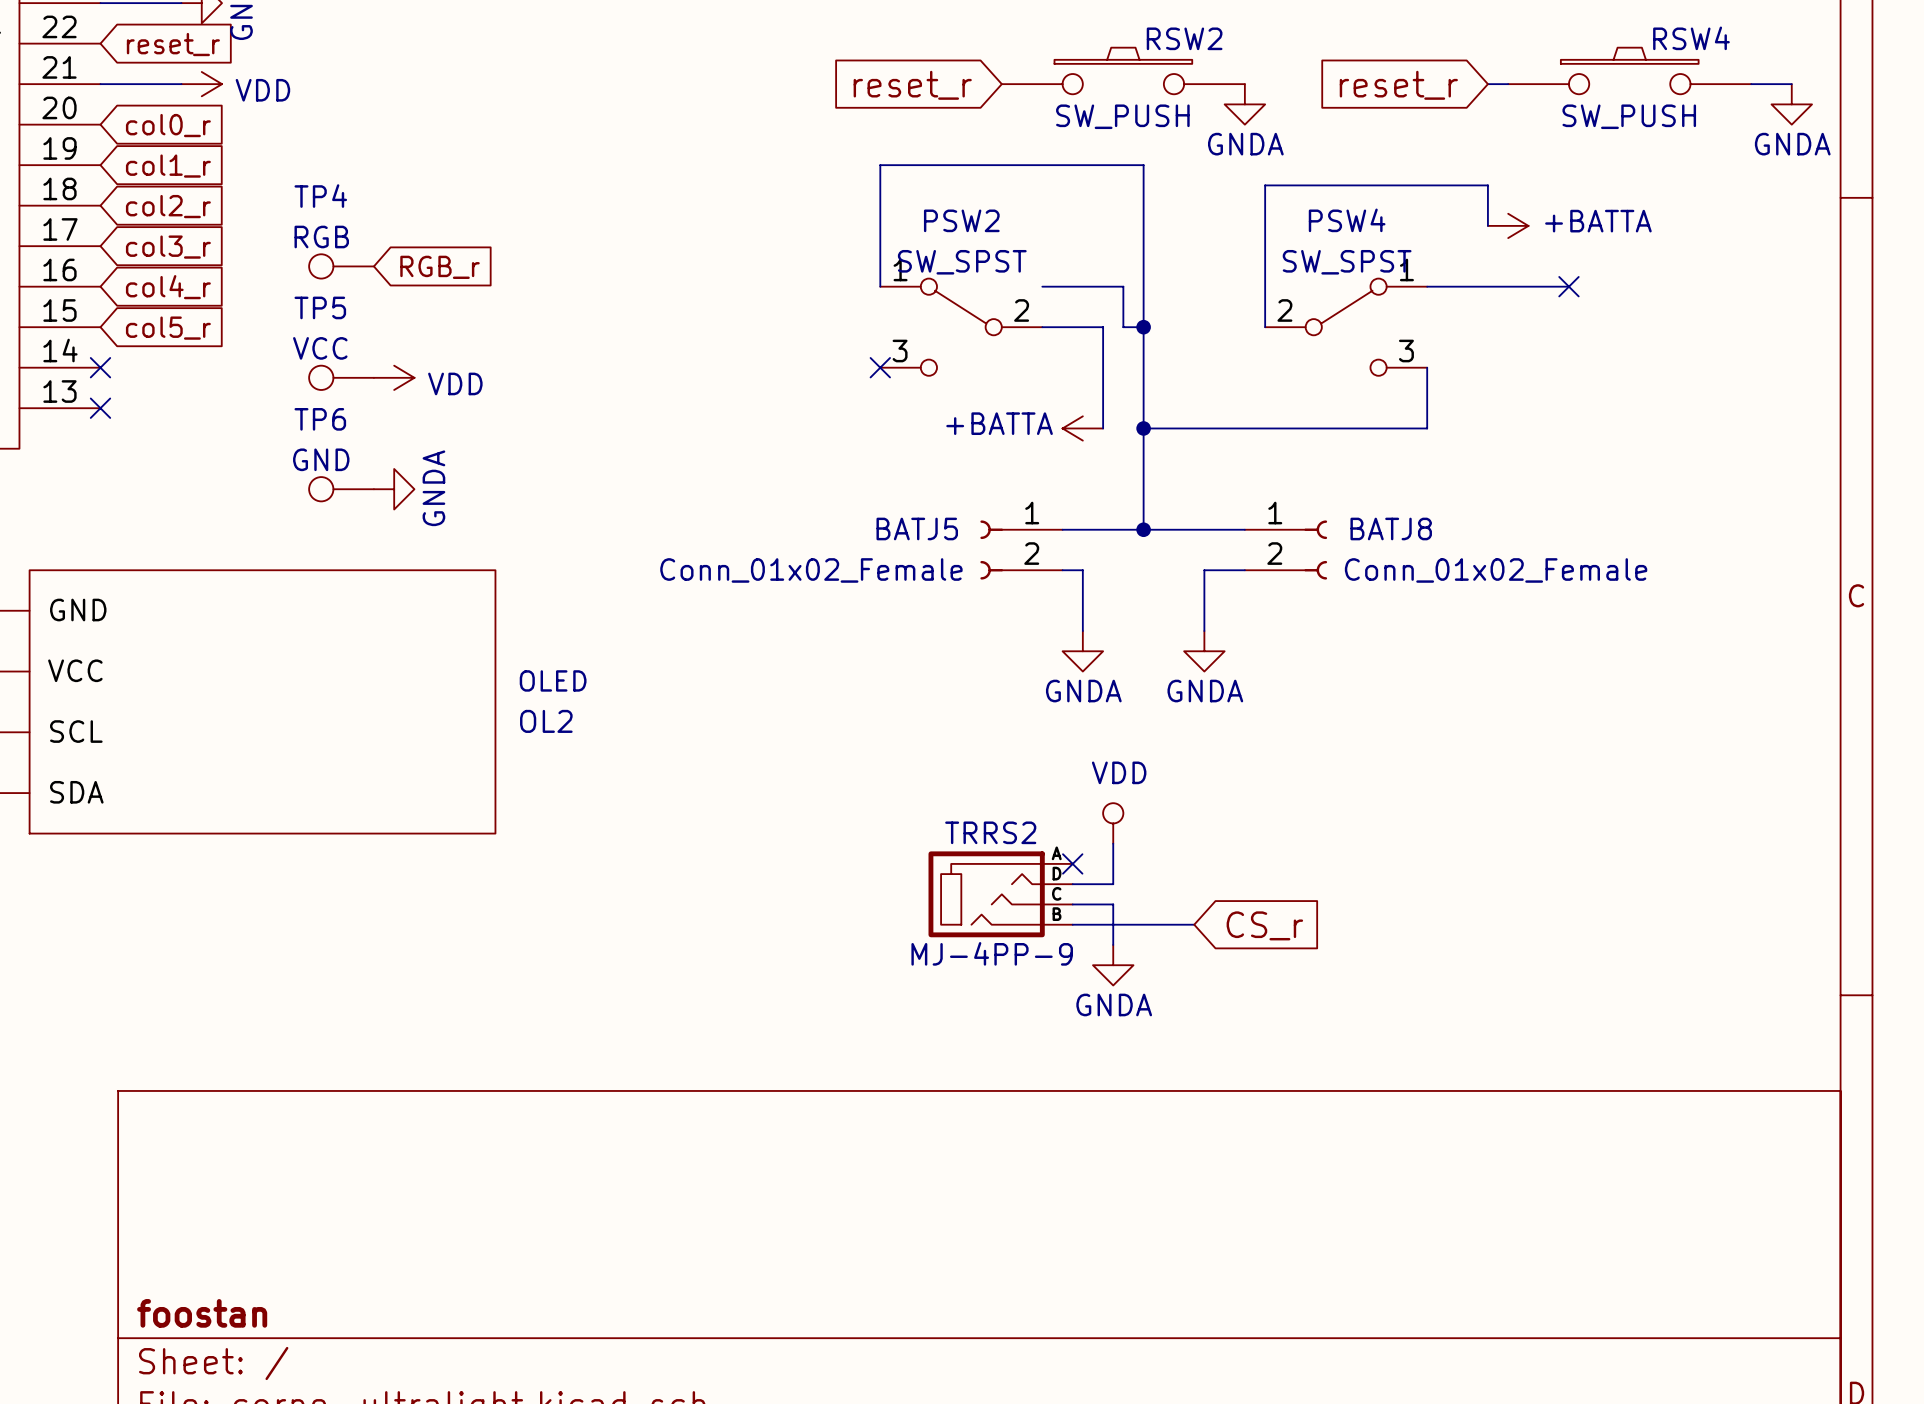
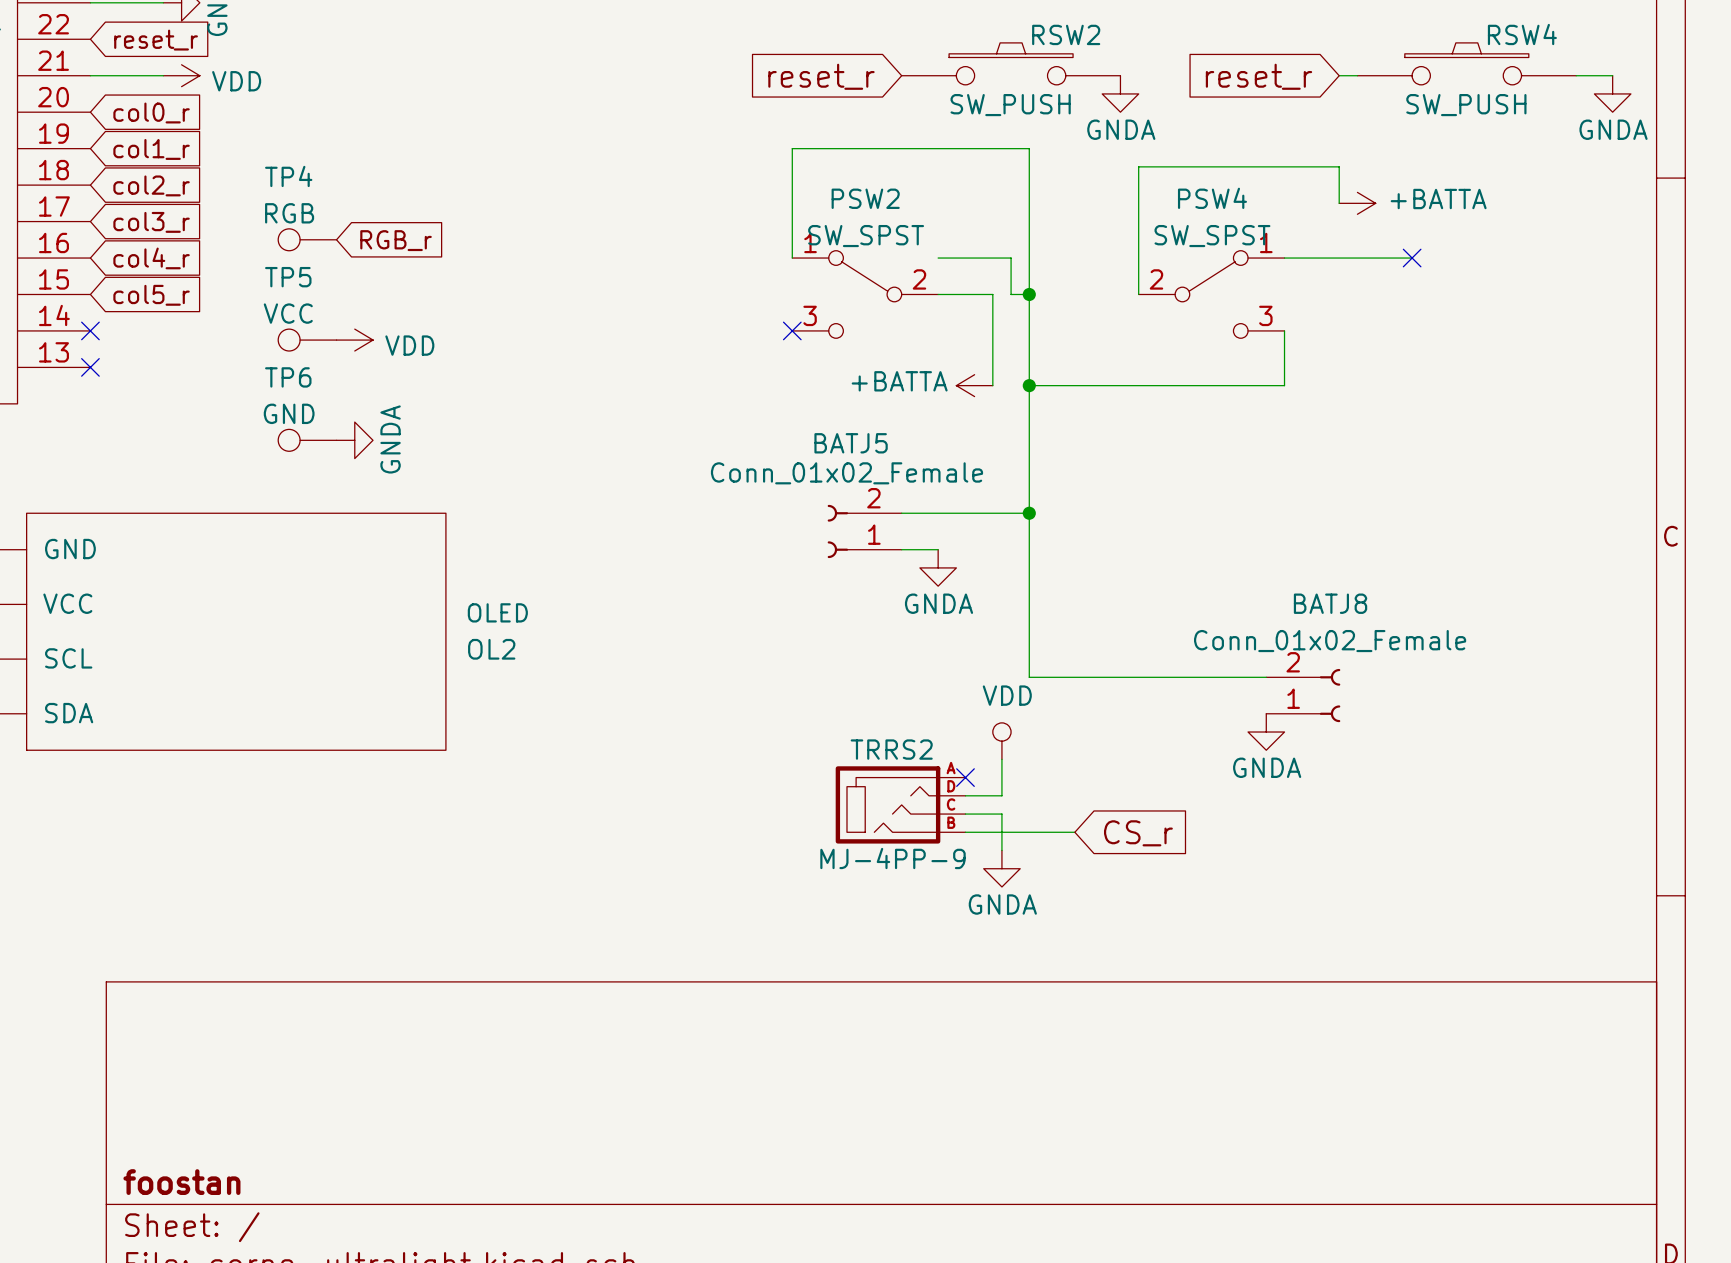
BATJ5 name position: BATJ5 (917, 528) -> BATJ5 (851, 443)
BATJ8 name position: BATJ8 (1391, 528) -> BATJ8 (1330, 603)
wire: (1062, 529) (1244, 529) -> none
wire: none -> (1029, 476) (1029, 677) (1266, 677)
junction position: (1143, 529) -> (1029, 513)
BATJ5 flip: as is (991, 550) -> up-down (837, 531)
BATJ5 position: (1021, 550) -> (864, 531)
BATJ8 position: (1286, 550) -> (1303, 695)
BATJ8 flip: as is (1315, 550) -> up-down (1330, 695)
BATJ5 value position: Conn_01x02_Female (811, 570) -> Conn_01x02_Female (846, 473)
wire: (1082, 570) (1082, 631) -> (974, 513) (1029, 513)
wire: (1244, 570) (1204, 570) (1204, 631) -> none
BATJ8 value position: Conn_01x02_Female (1496, 570) -> Conn_01x02_Female (1330, 641)
wire: none -> (901, 549) (938, 549)
power symbol position: GNDA (1082, 651) -> GNDA (938, 567)
power symbol: GNDA (1204, 651) -> none
power symbol: none -> GNDA (1266, 732)

